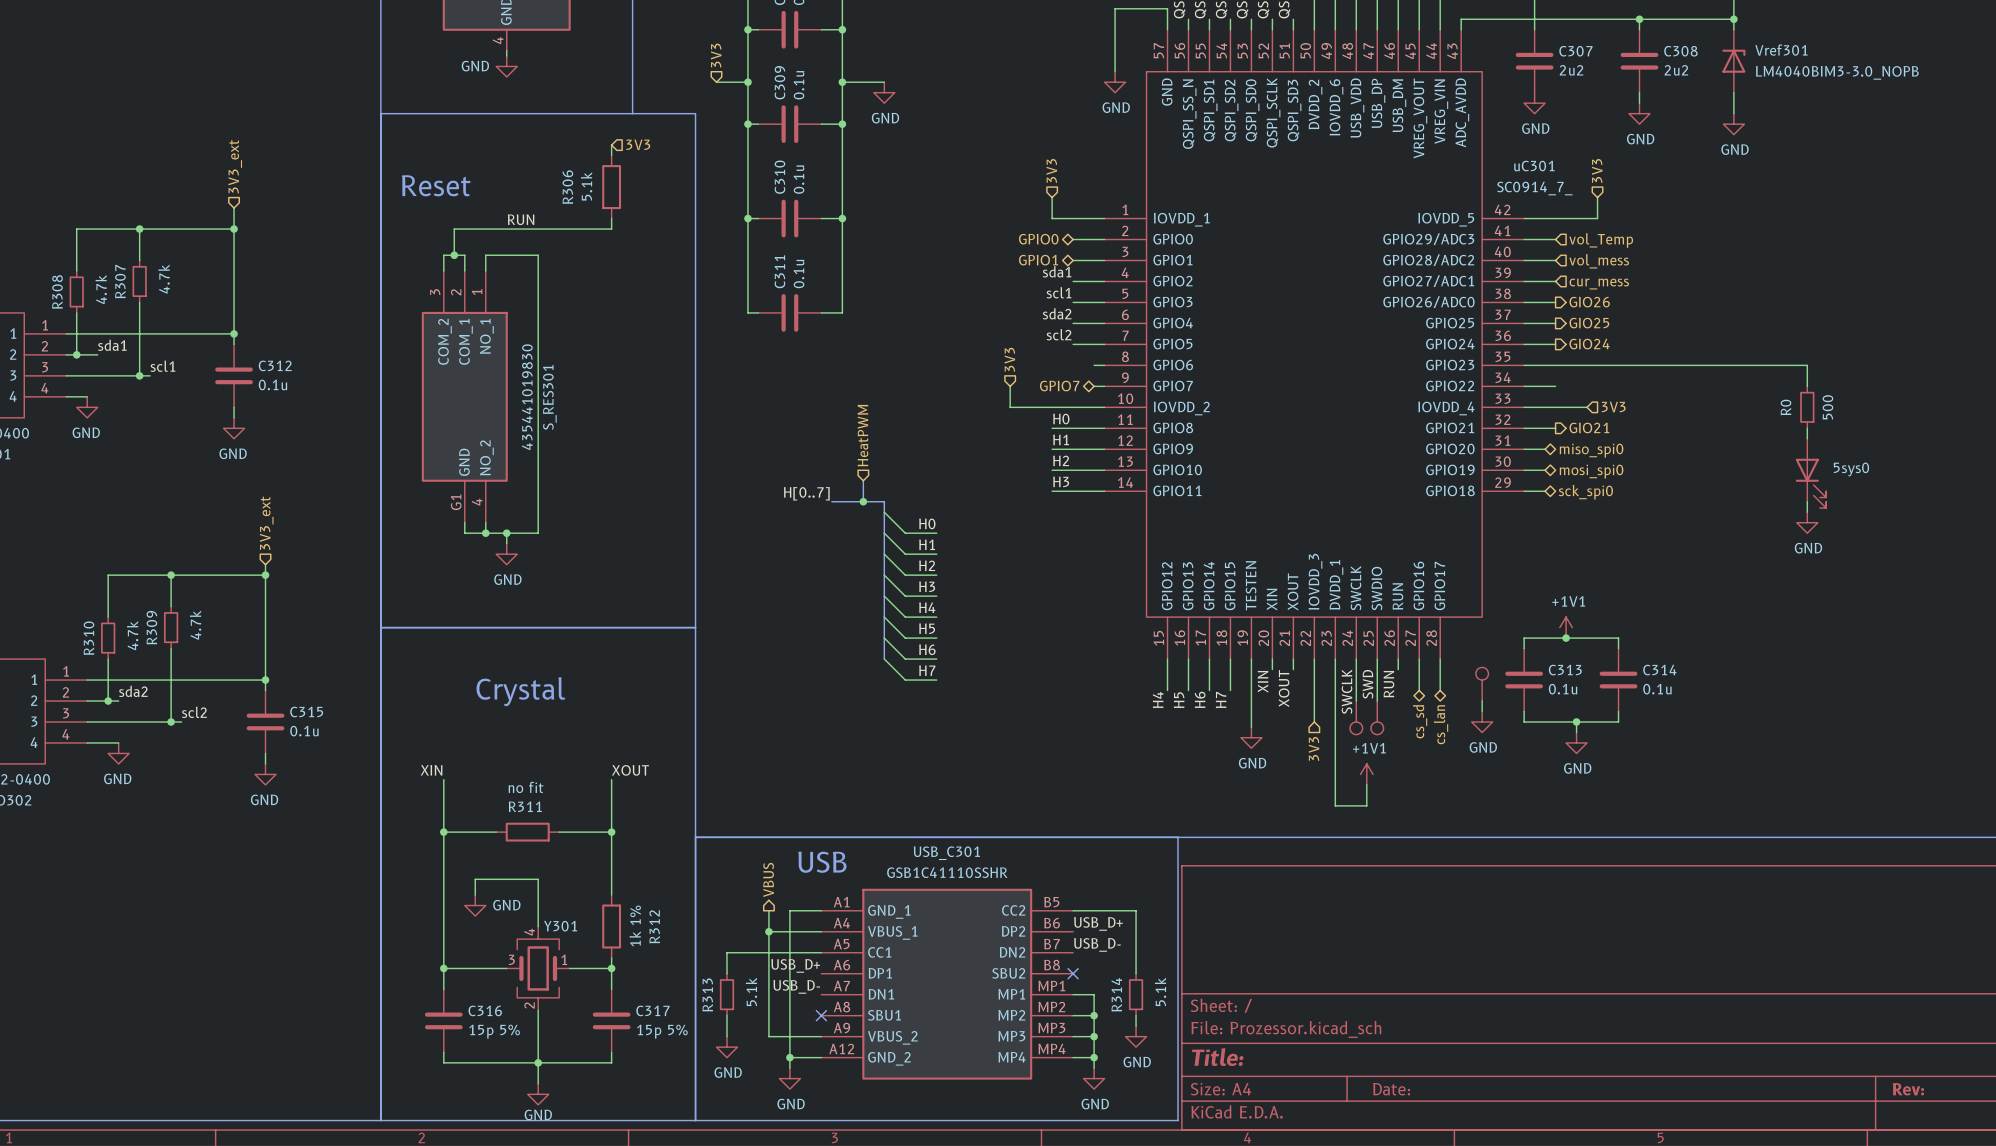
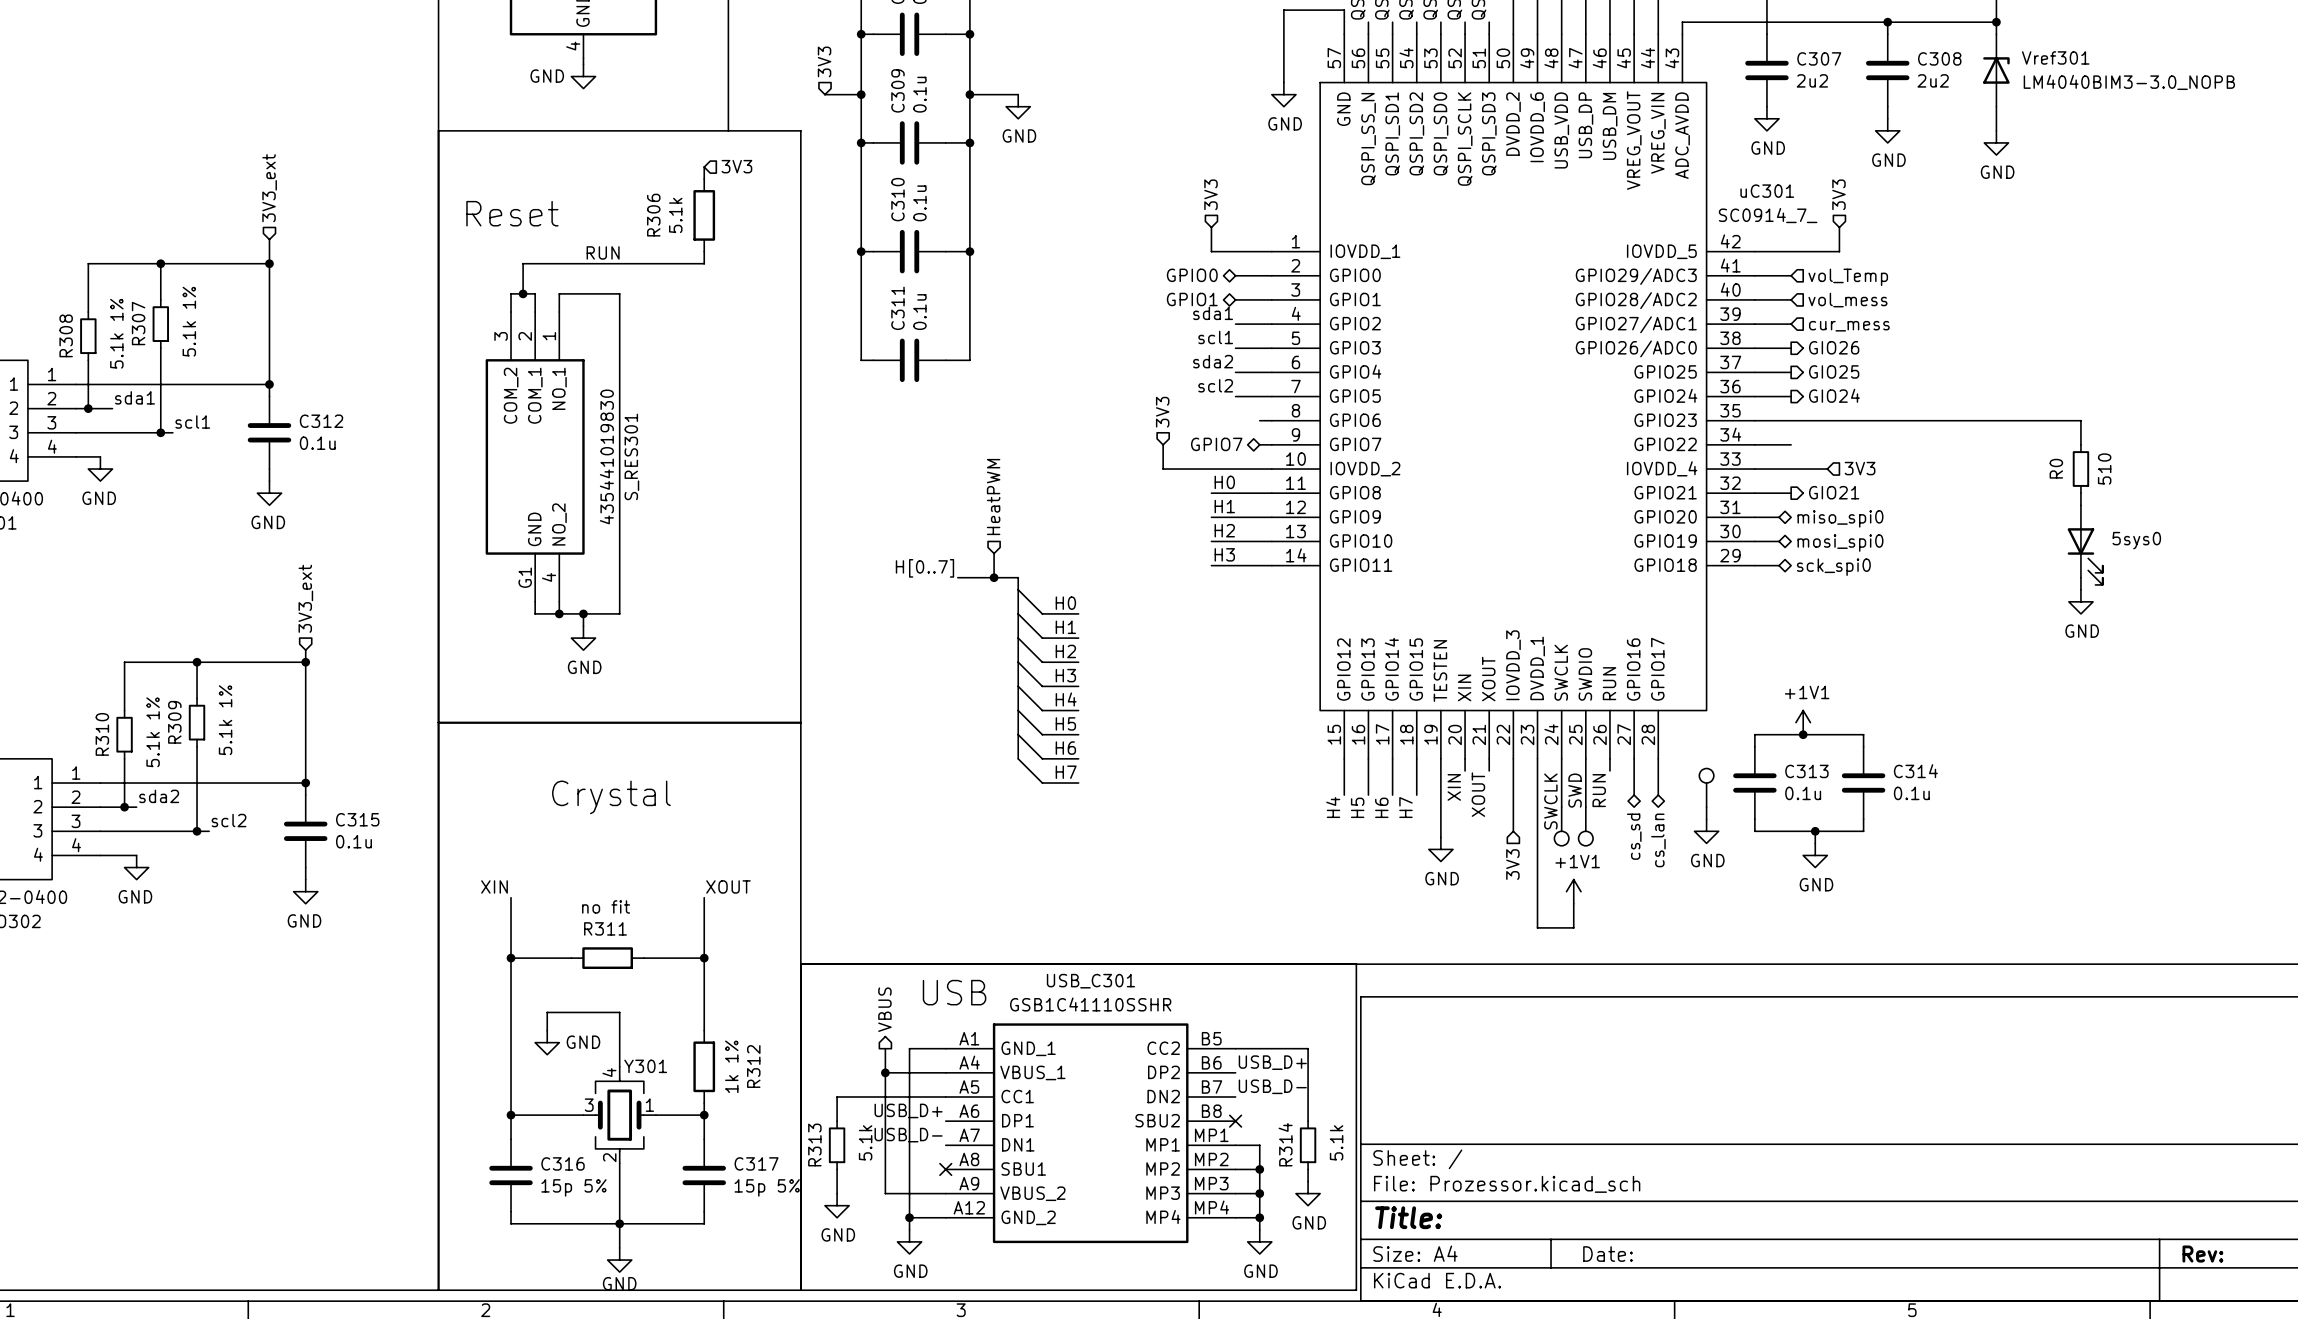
R307 value: 4.7k (164, 279) -> 5.1k 1% (189, 321)
R308 value: 4.7k (101, 289) -> 5.1k 1% (116, 333)
R0 value: 500 (1827, 407) -> 510 (2104, 469)
R309 value: 4.7k (195, 625) -> 5.1k 1% (225, 720)
R310 value: 4.7k (132, 635) -> 5.1k 1% (153, 732)

